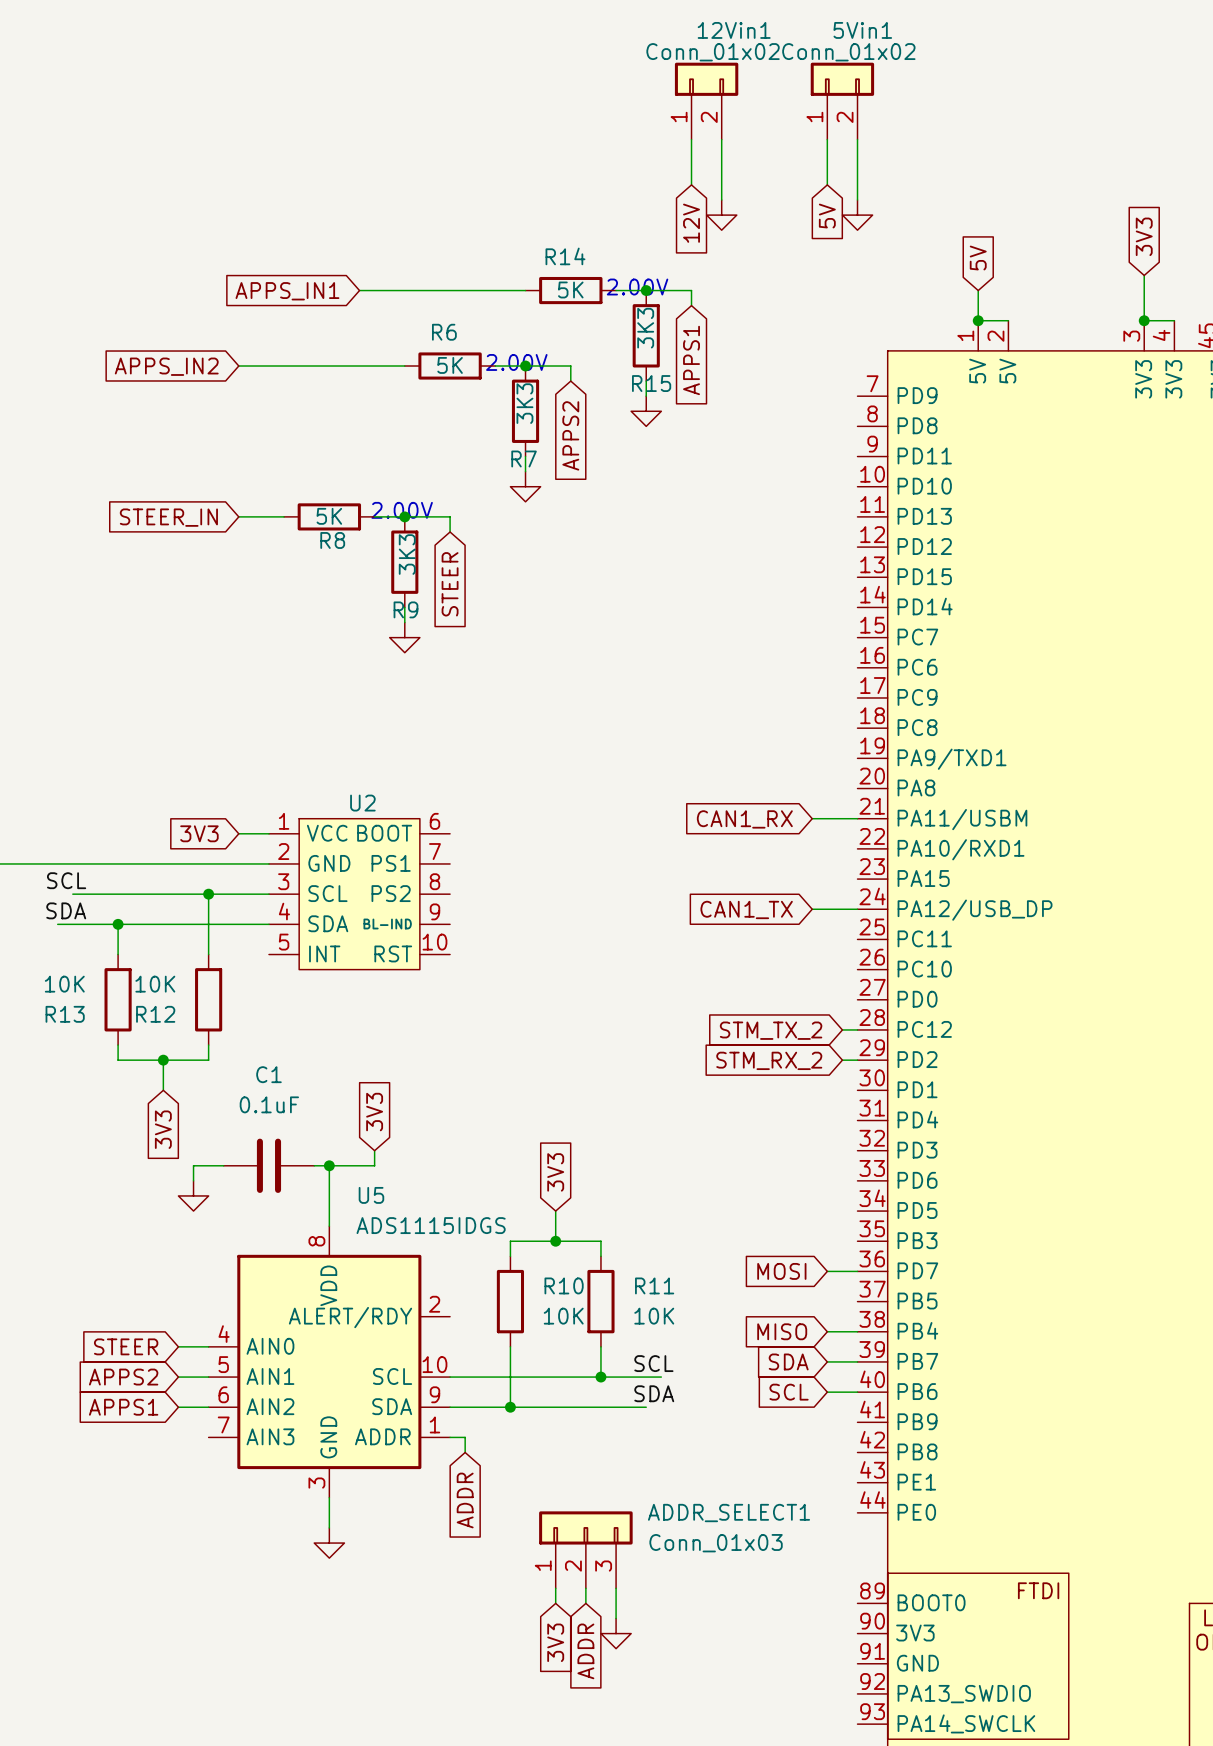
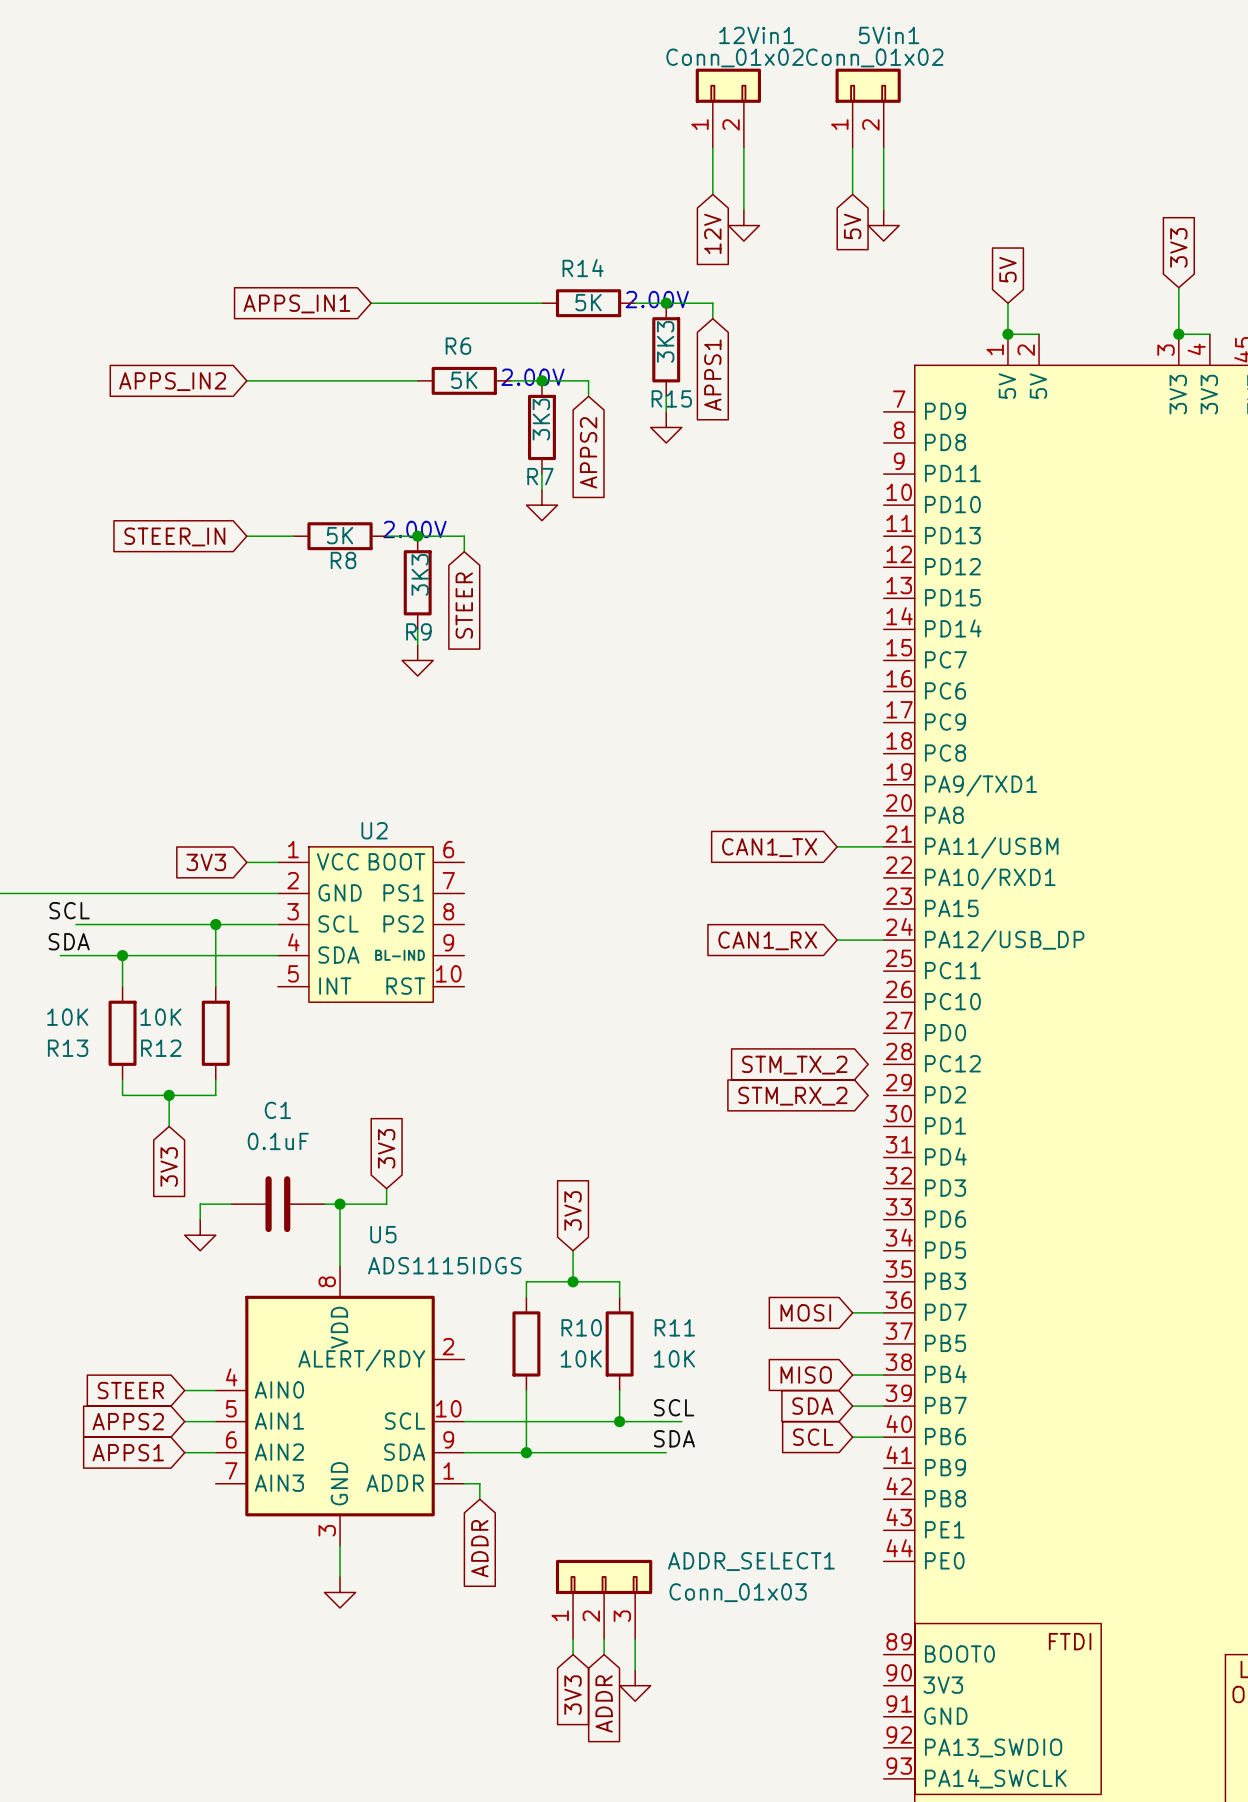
global label: CAN1_RX (744, 819) -> CAN1_TX (769, 847)
global label: CAN1_TX (746, 909) -> CAN1_RX (767, 940)
wire: (842, 1029) (857, 1029) -> none
wire: (842, 1060) (857, 1060) -> none

